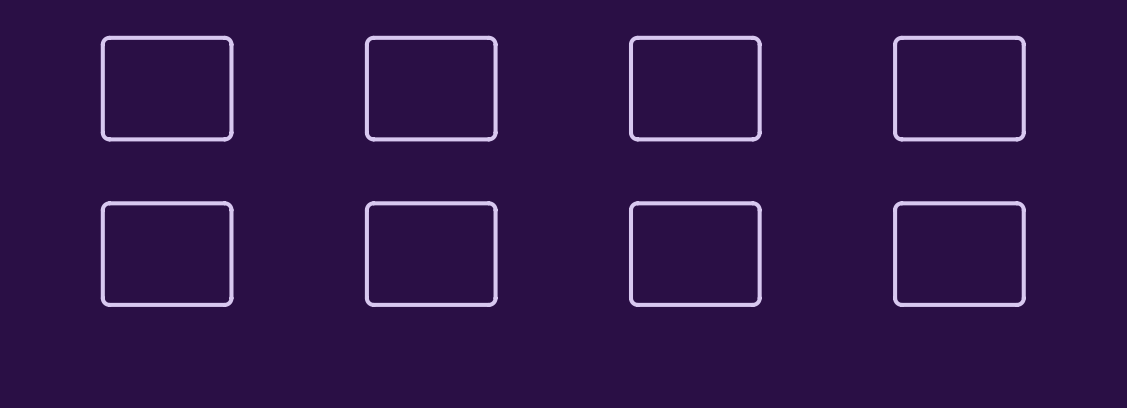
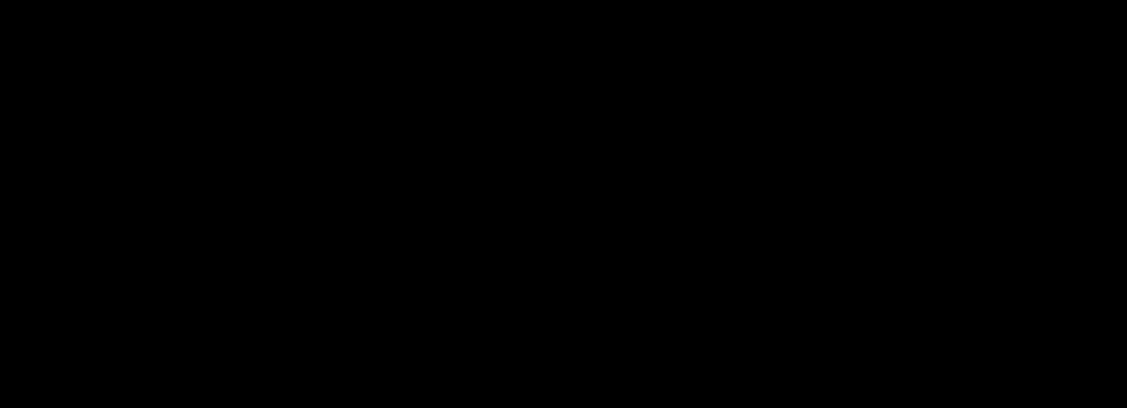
part: (167, 88) -> none
part: (431, 88) -> none
part: (695, 88) -> none
part: (959, 88) -> none
part: (167, 254) -> none
part: (431, 254) -> none
part: (695, 254) -> none
part: (959, 254) -> none

